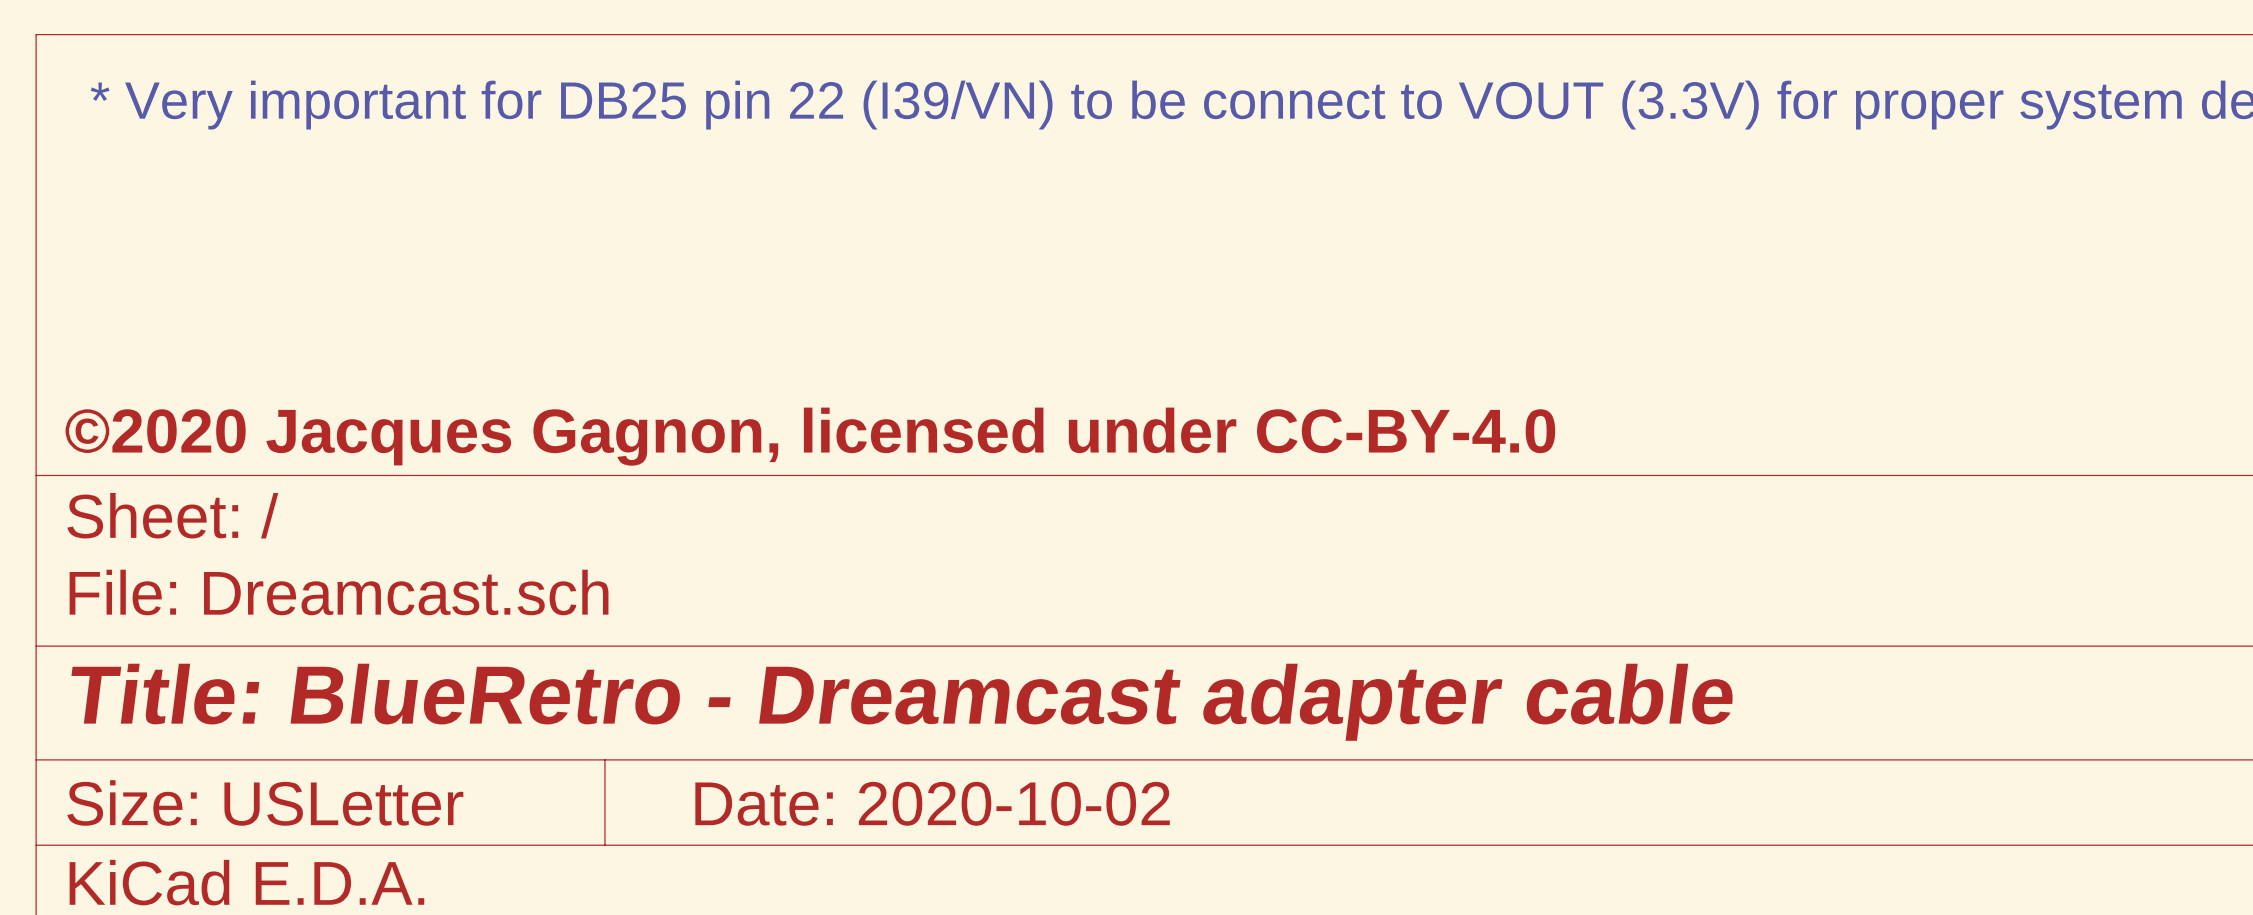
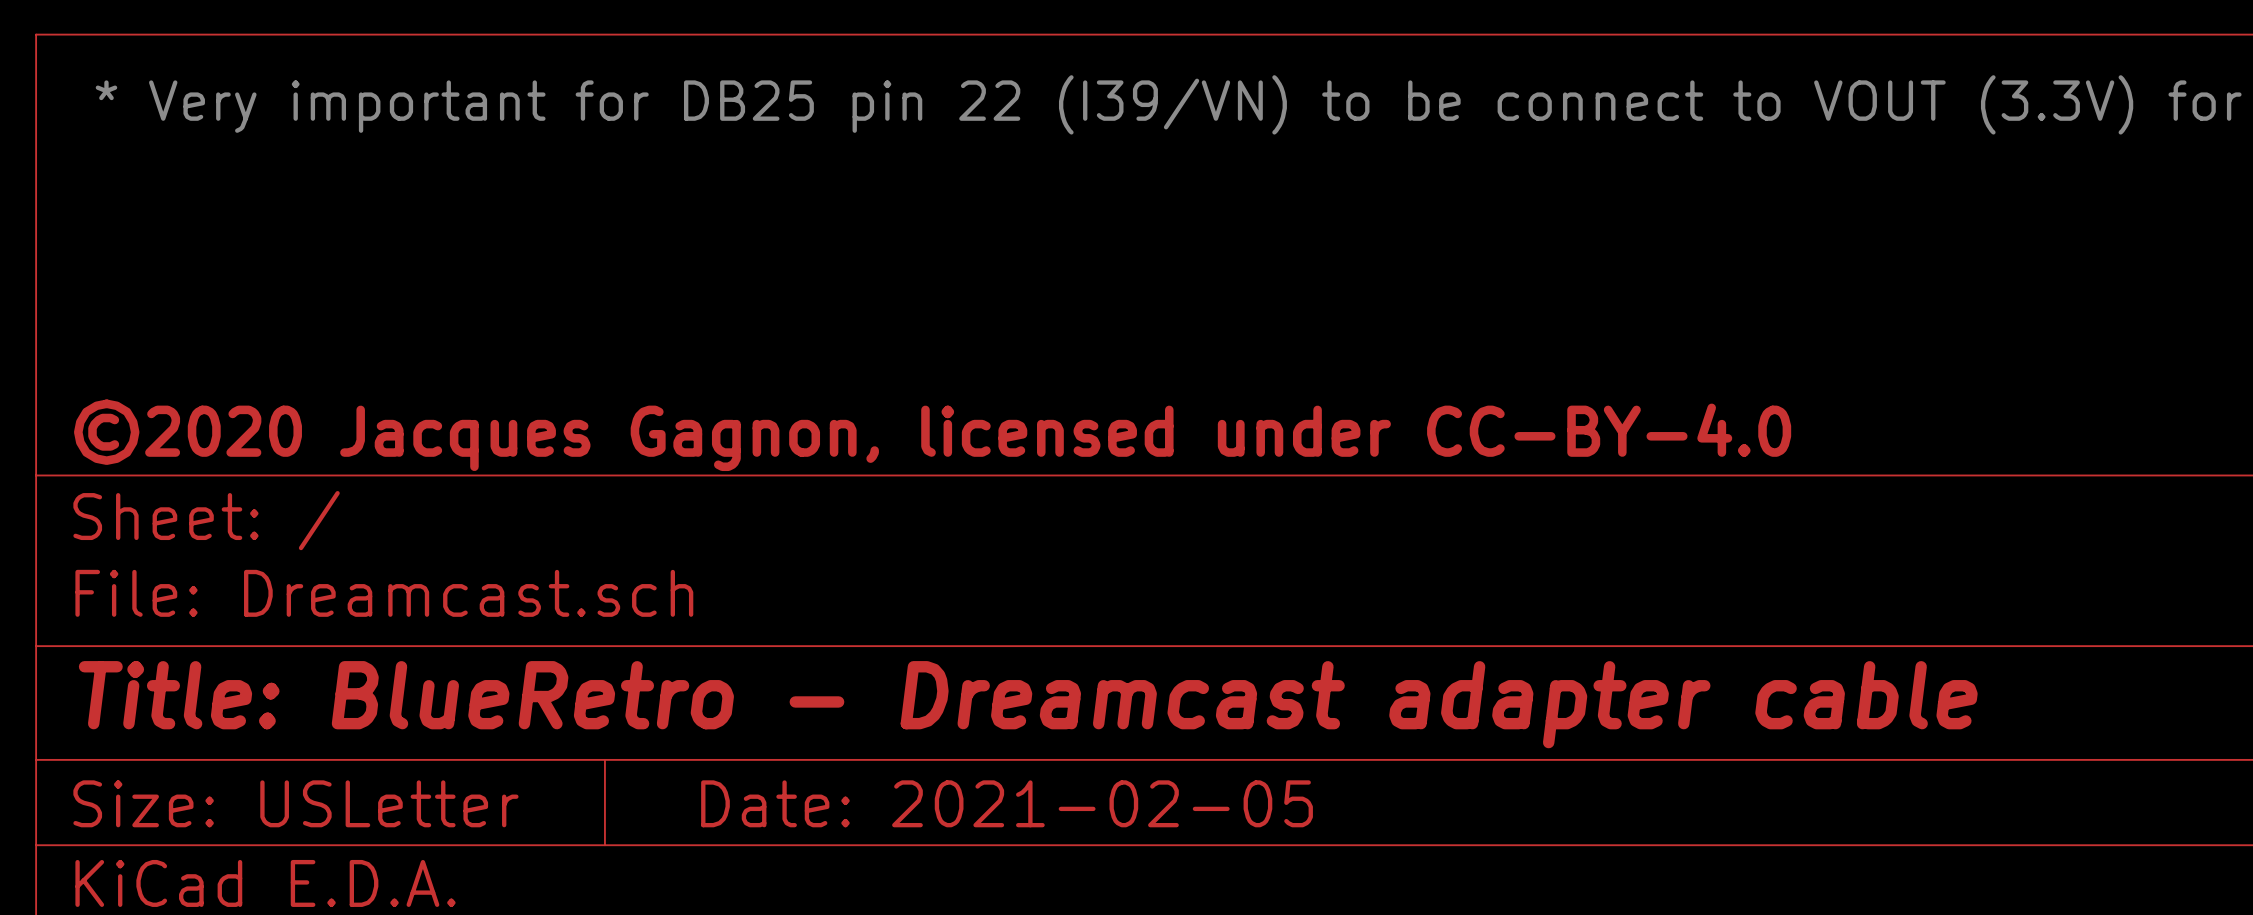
title block: Date: 2020-10-02 (932, 803) -> Date: 2021-02-05 (1007, 803)

